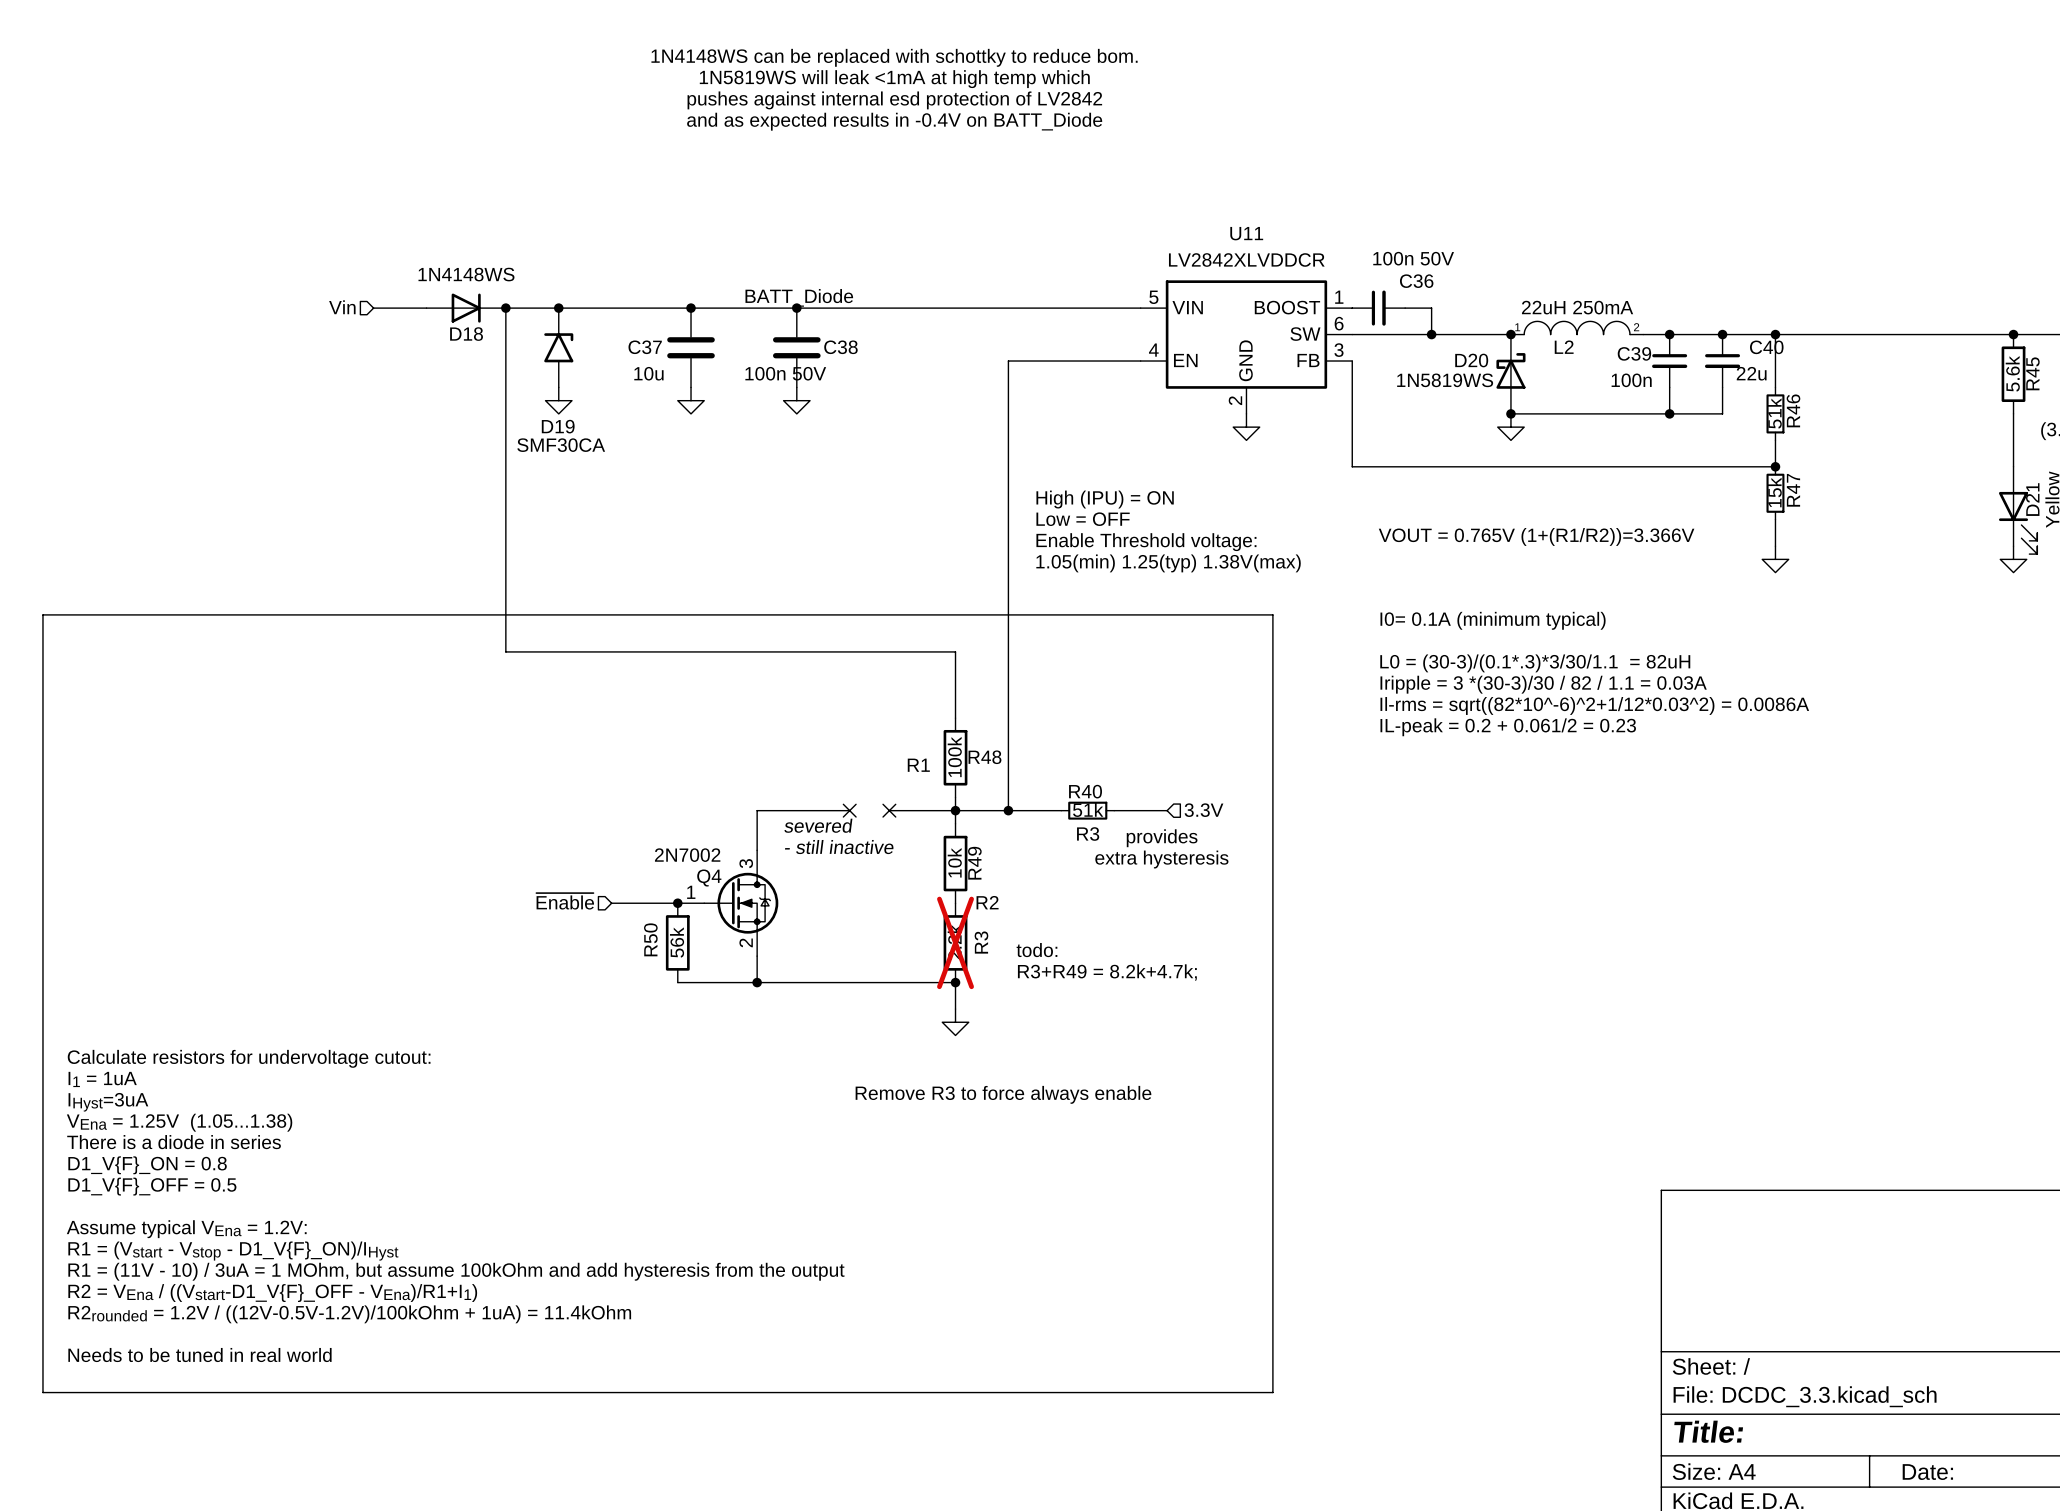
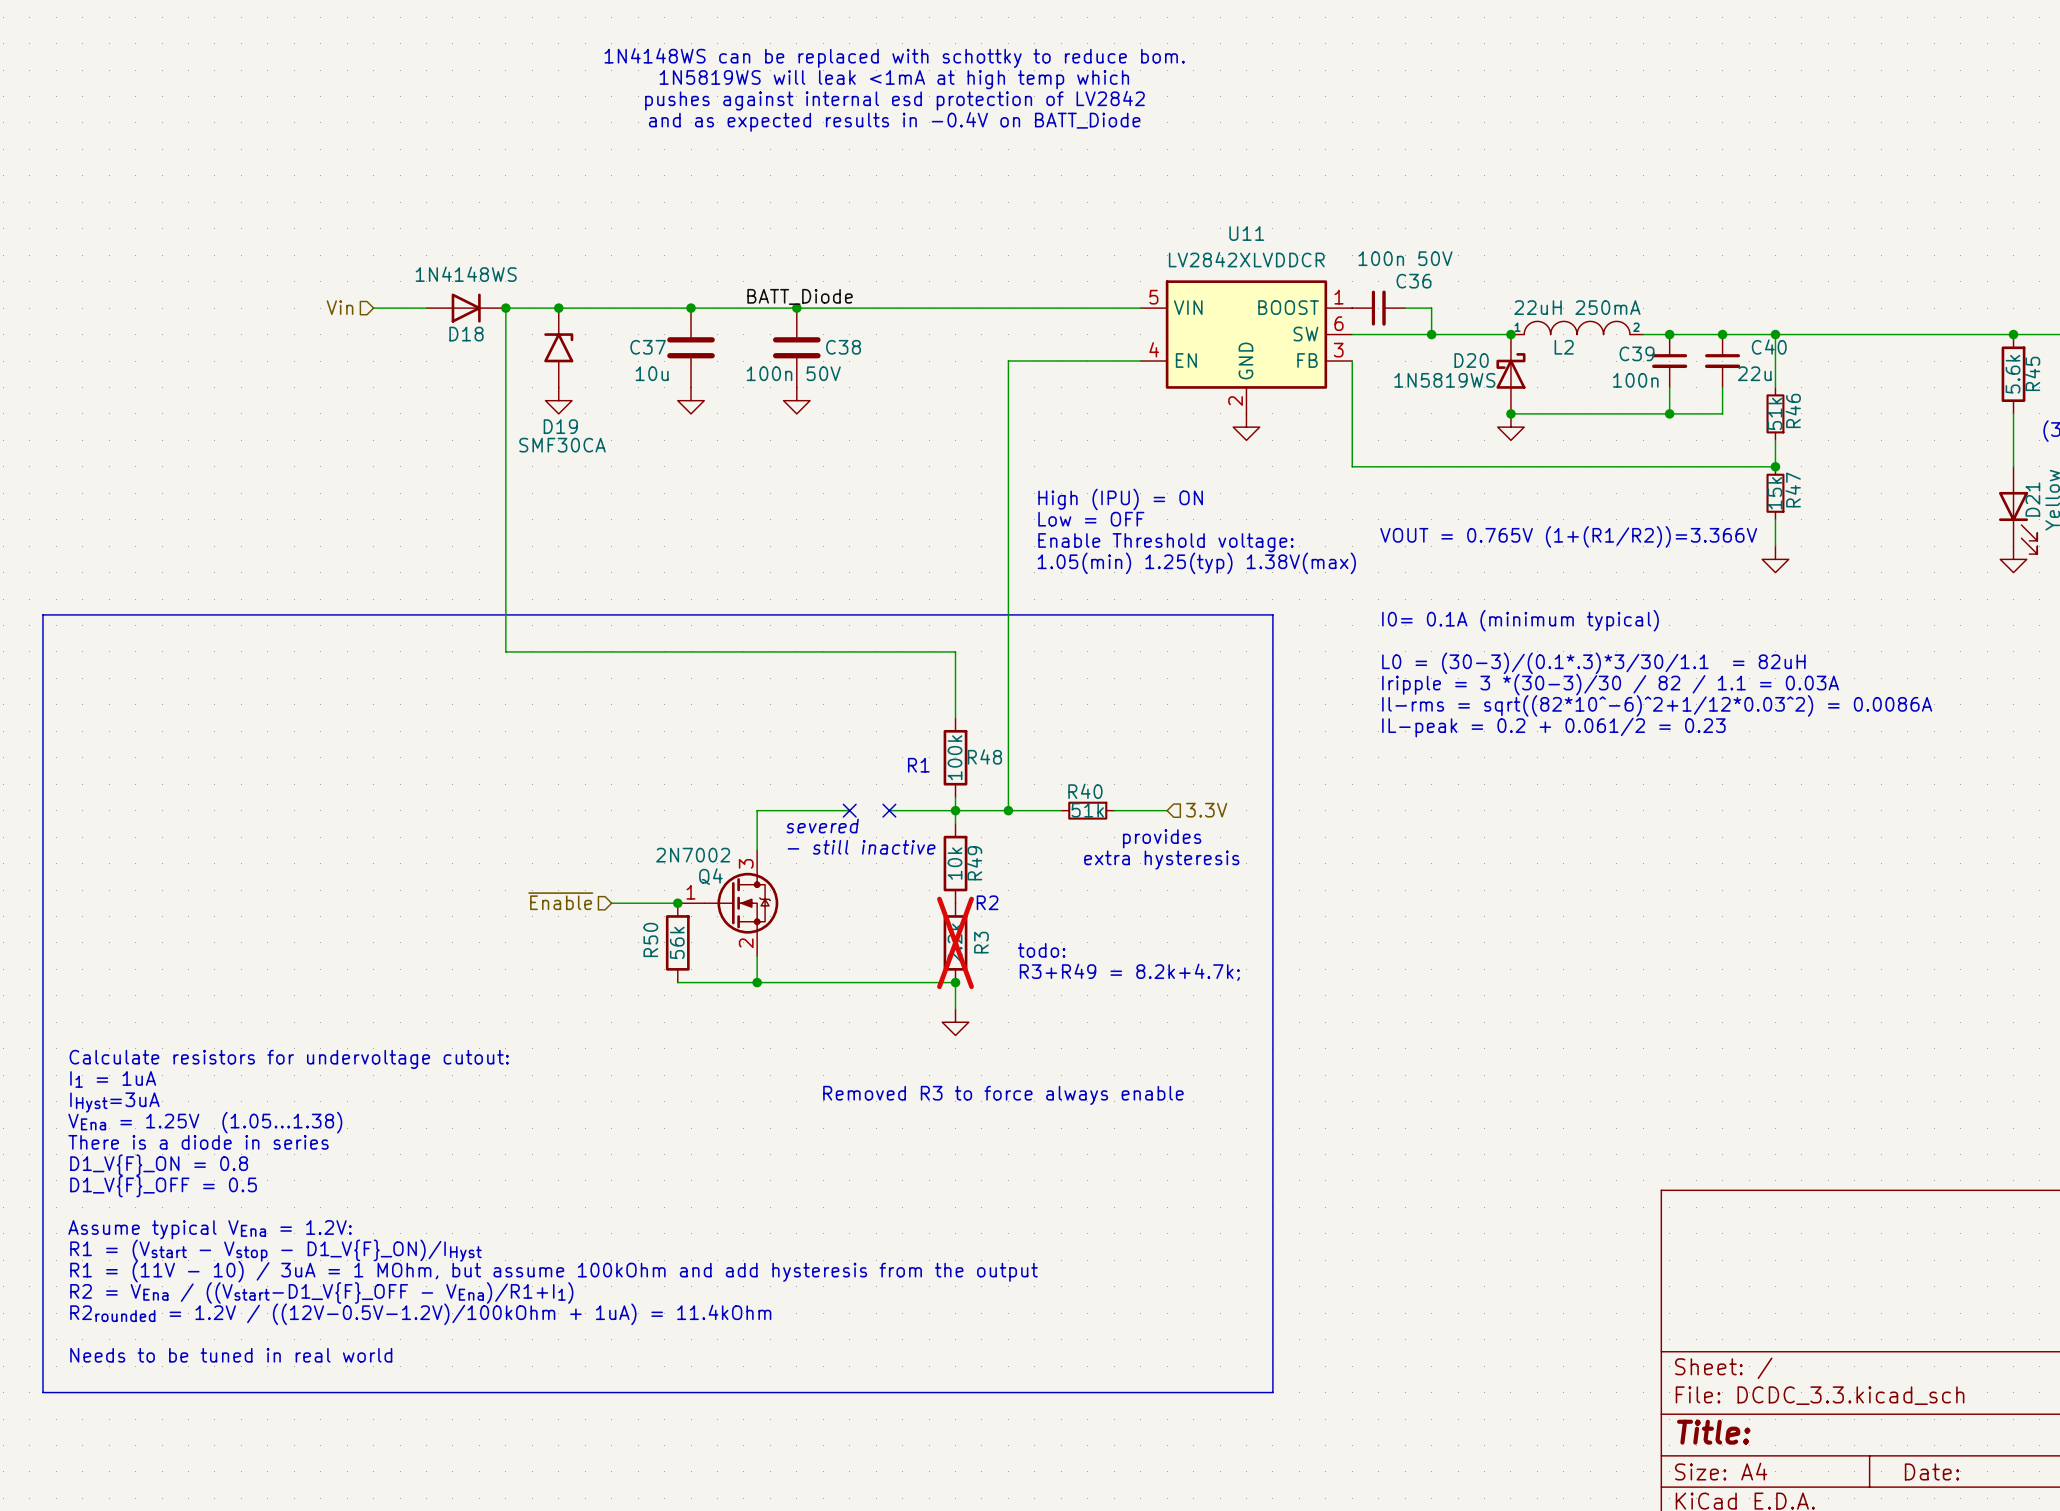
text: R3 (1088, 834) -> none
text: Remove R3 to force always enable (1003, 1094) -> Removed R3 to force always enable (1003, 1095)

